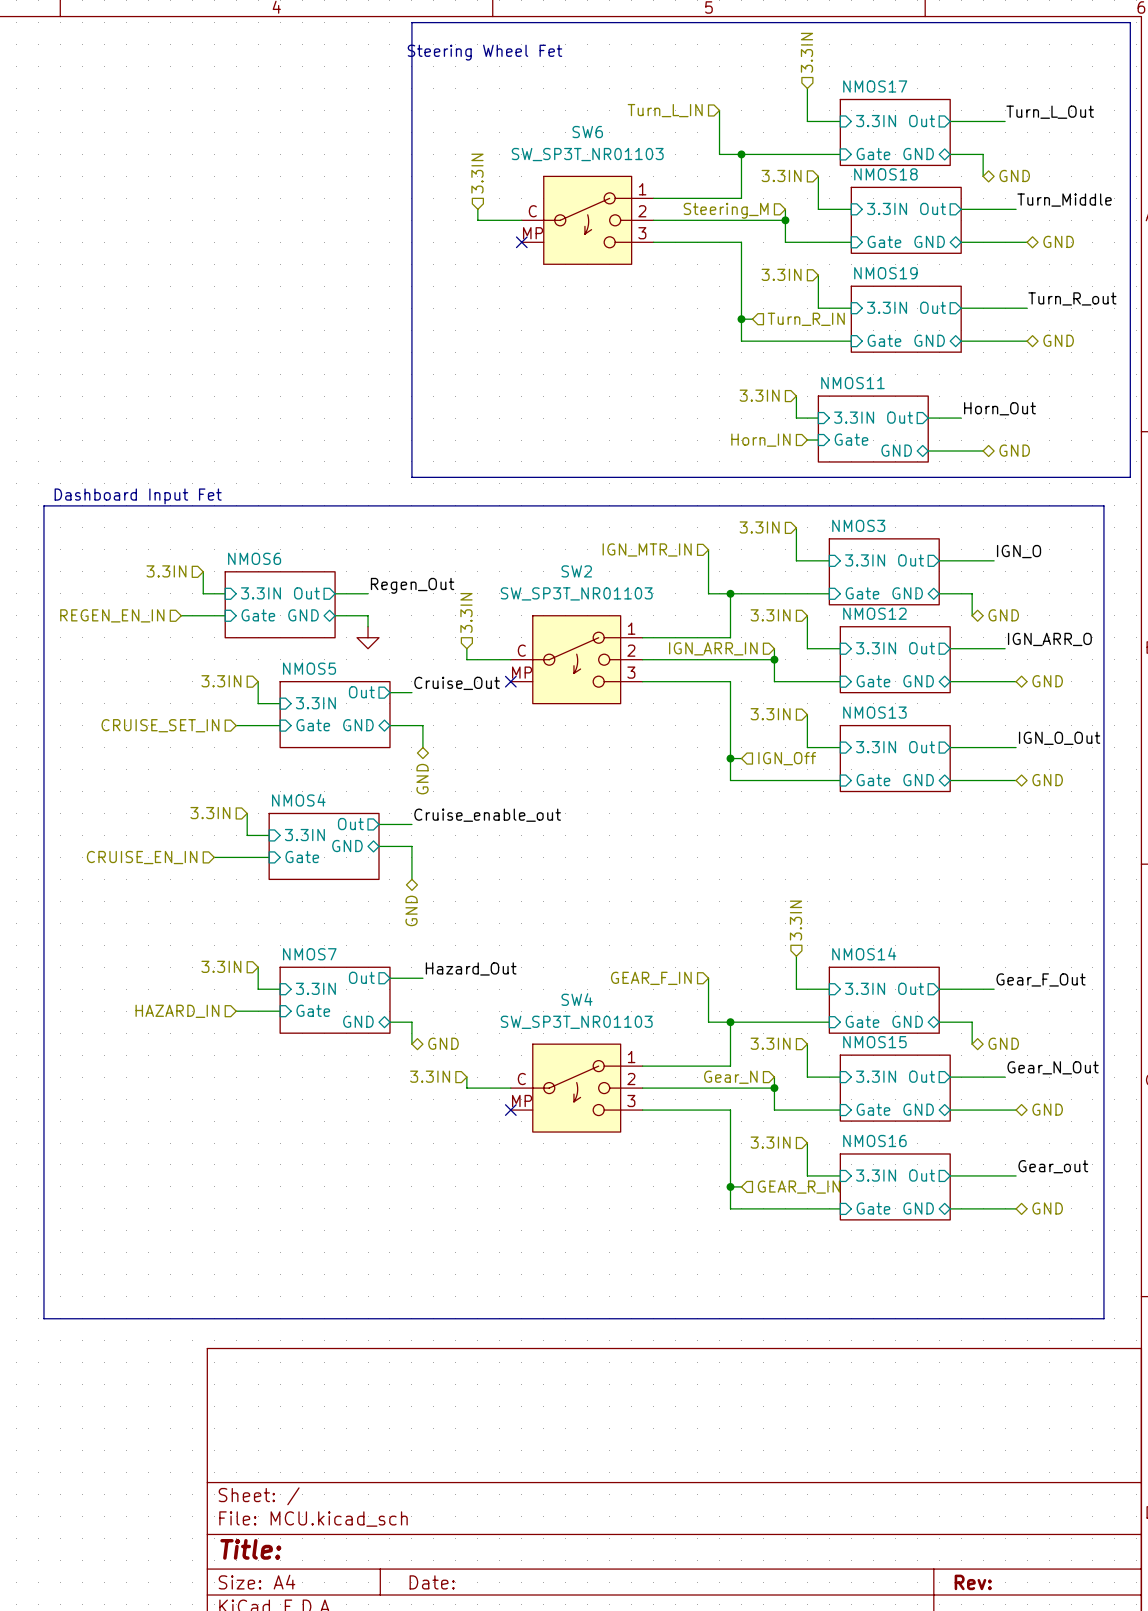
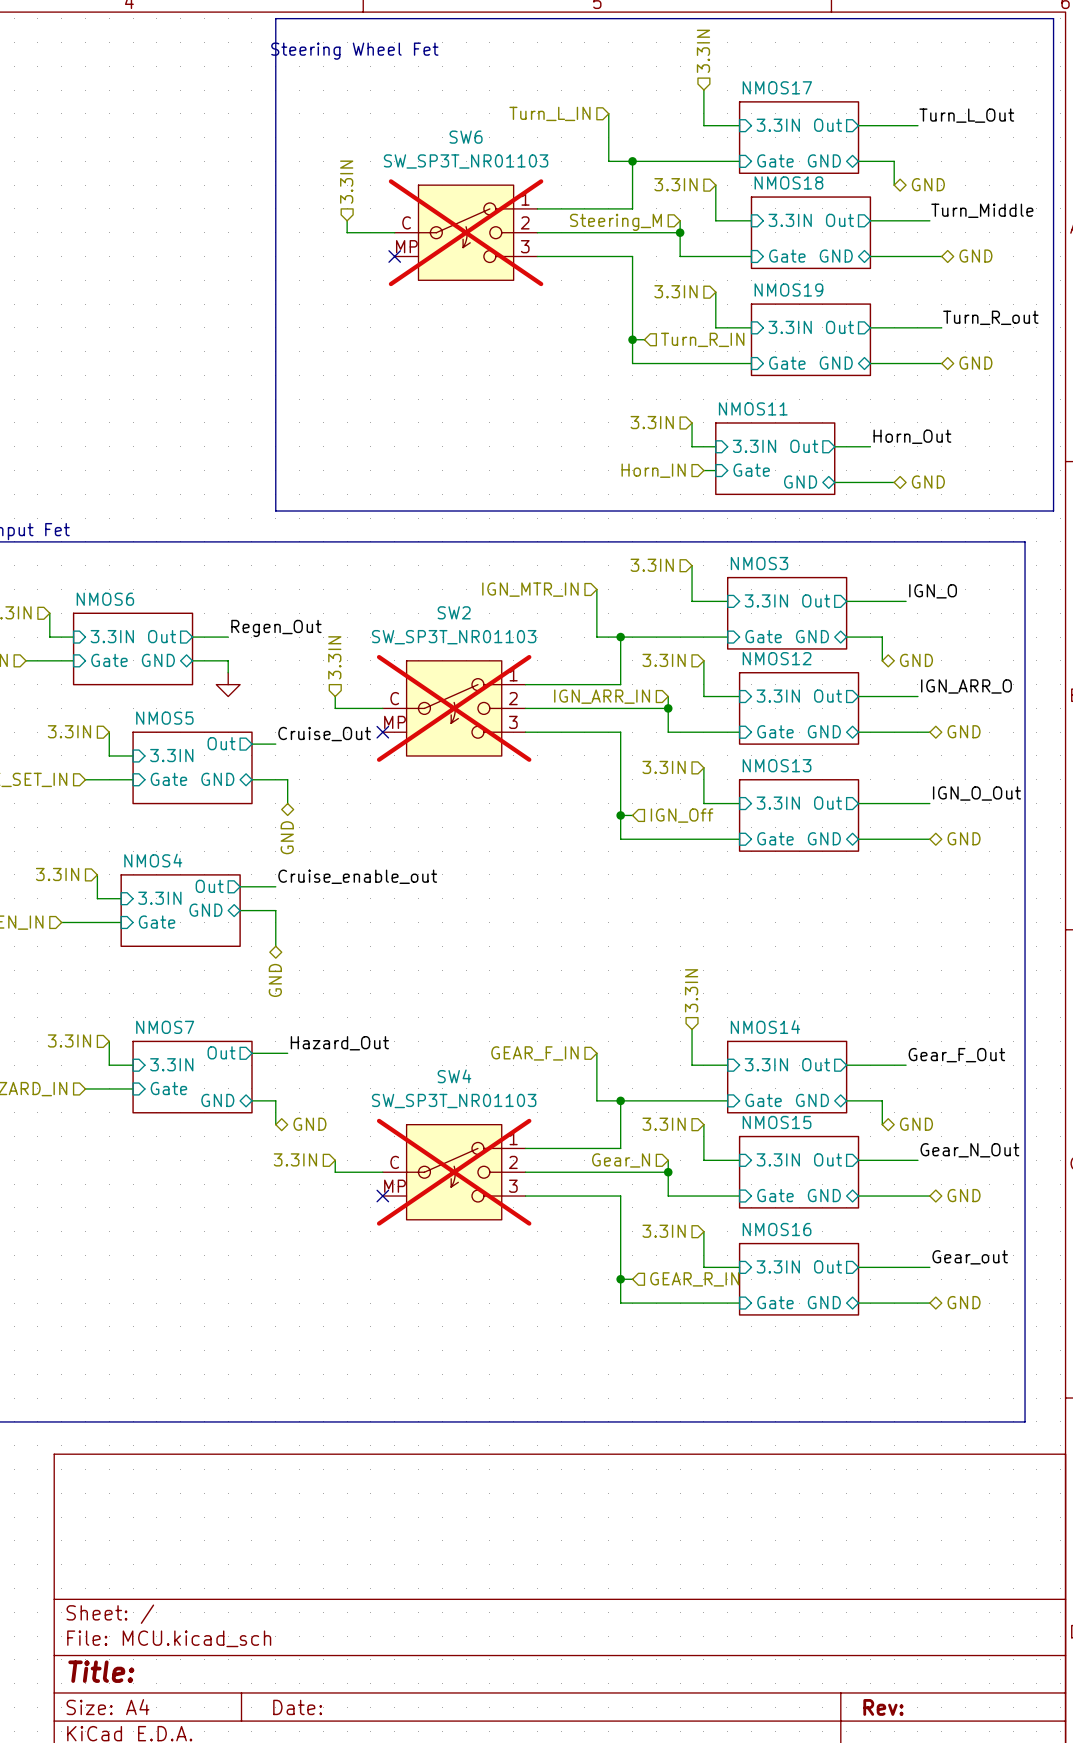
SW6 do-not-place cross: none -> (466, 232)
SW2 do-not-place cross: none -> (454, 708)
SW4 do-not-place cross: none -> (454, 1172)

